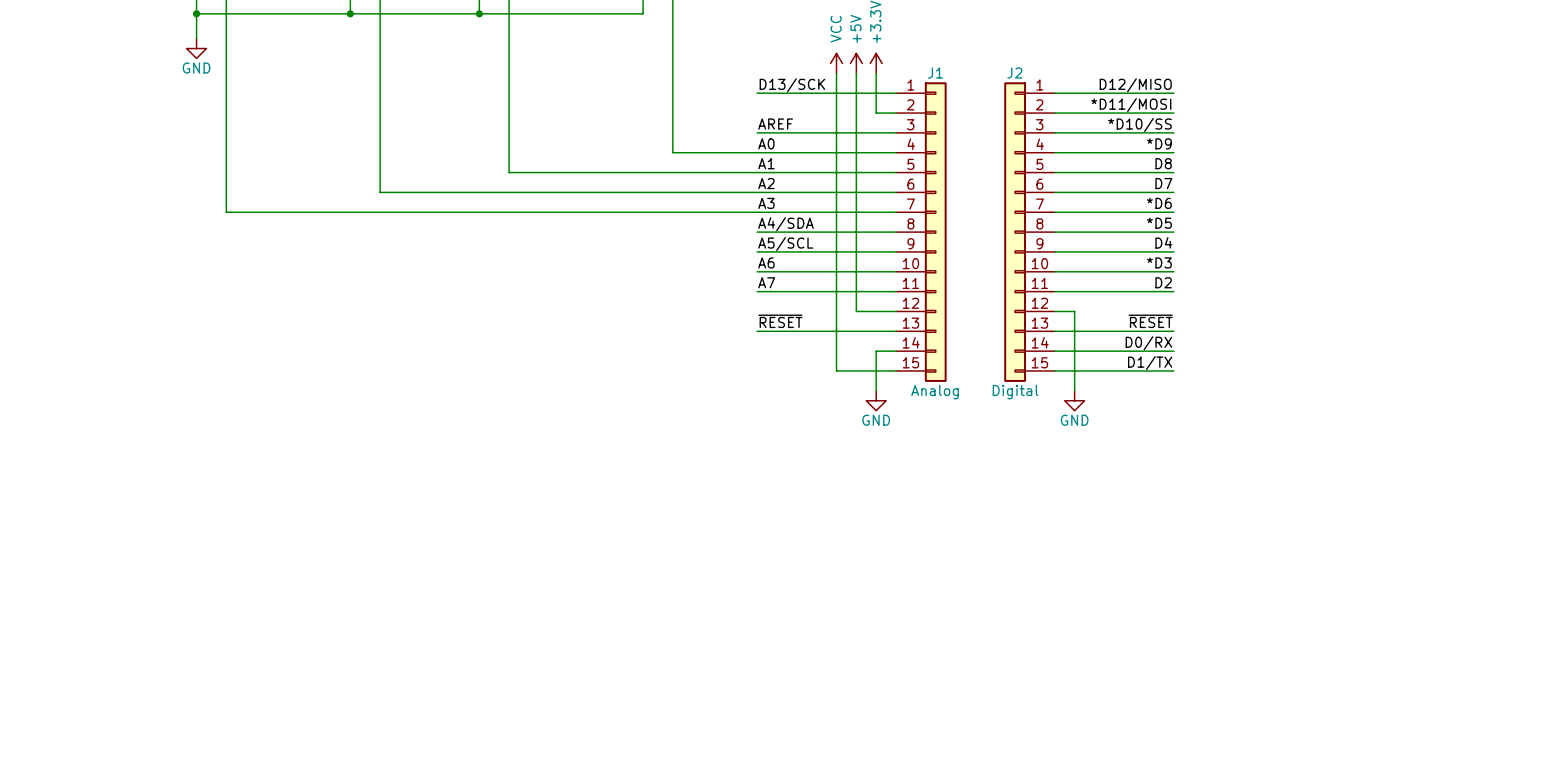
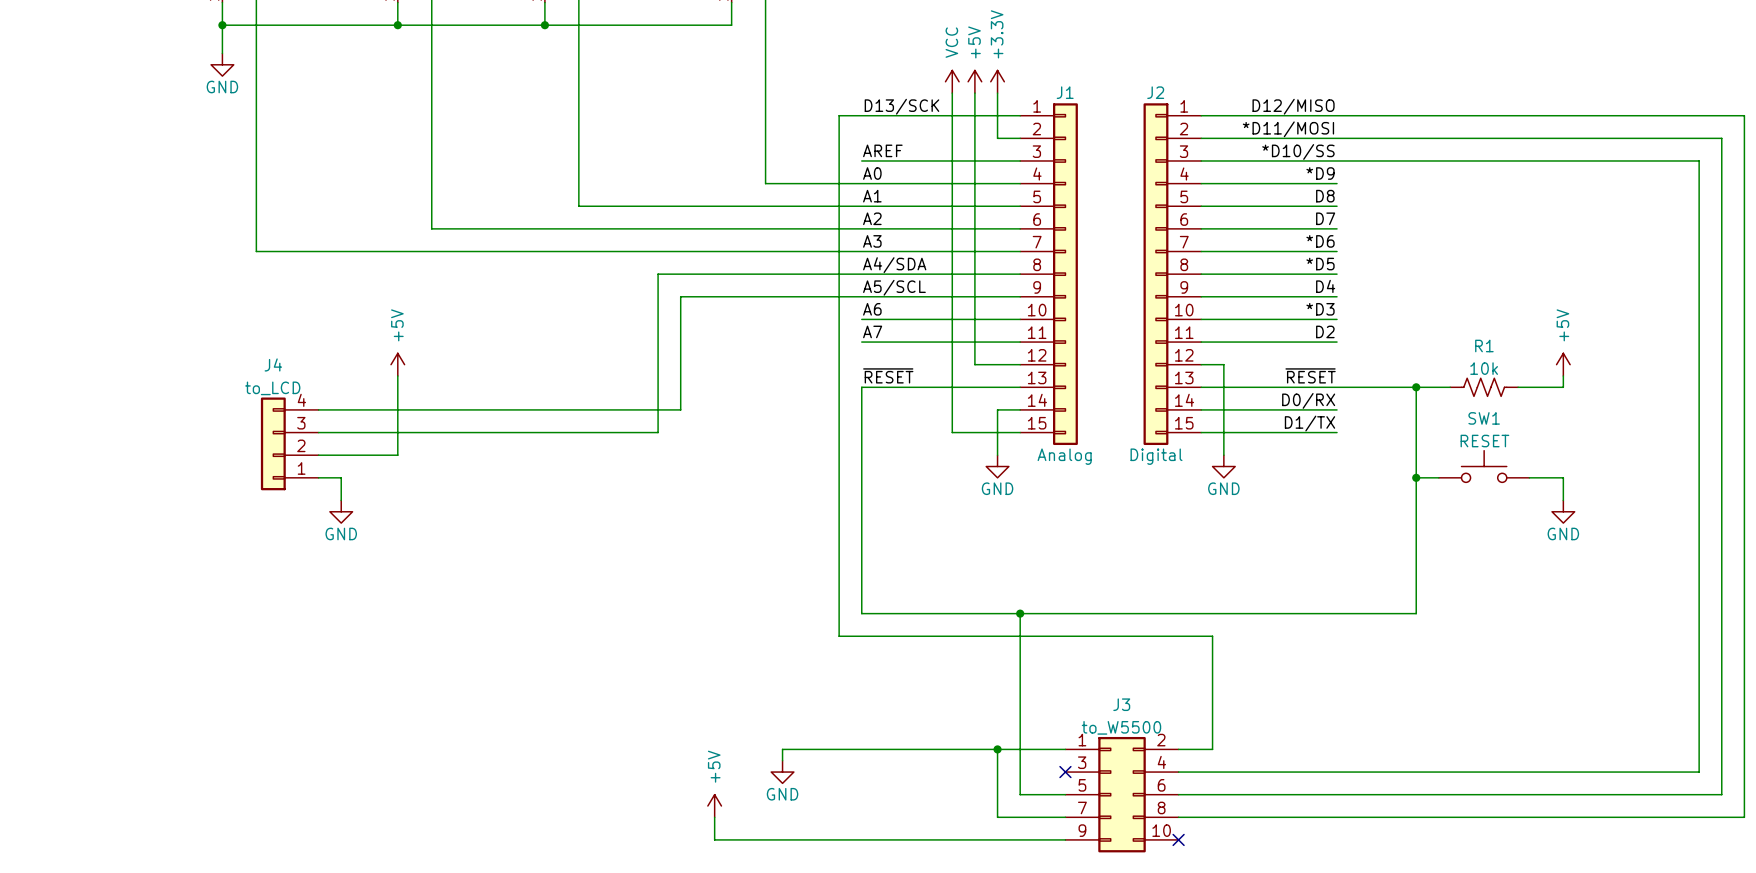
wire: none -> (861, 115) (839, 115) (839, 636) (1212, 636) (1212, 749) (1178, 749)
wire: none -> (1337, 115) (1744, 115) (1744, 817) (1178, 817)
wire: none -> (1337, 138) (1721, 138) (1721, 794) (1178, 794)
wire: none -> (1337, 160) (1699, 160) (1699, 772) (1178, 772)
wire: none -> (861, 274) (658, 274) (658, 432) (318, 432)
wire: none -> (861, 296) (680, 296) (680, 409) (318, 409)
power symbol: none -> +5V (397, 364)
power symbol: none -> +5V (1563, 364)
wire: none -> (397, 375) (397, 455) (318, 455)
wire: none -> (1563, 375) (1563, 387) (1518, 387)
wire: none -> (861, 387) (861, 613) (1416, 613) (1416, 387)
wire: none -> (1337, 387) (1450, 387)
junction: none -> (1416, 387)
R1: none -> 10k (1484, 387)
J4: none -> to_LCD (289, 443)
SW1: none -> RESET (1484, 466)
wire: none -> (318, 477) (341, 477) (341, 500)
wire: none -> (1416, 477) (1438, 477)
junction: none -> (1416, 477)
wire: none -> (1529, 477) (1563, 477) (1563, 500)
power symbol: none -> GND (341, 511)
power symbol: none -> GND (1563, 511)
wire: none -> (1020, 613) (1020, 794) (1065, 794)
junction: none -> (1020, 613)
wire: none -> (997, 749) (997, 817) (1065, 817)
junction: none -> (997, 749)
wire: none -> (1065, 749) (782, 749) (782, 760)
power symbol: none -> GND (782, 772)
no-connect mark: none -> (1065, 772)
J3: none -> to_W5500 (1122, 794)
power symbol: none -> +5V (714, 805)
wire: none -> (714, 817) (714, 839) (1065, 839)
no-connect mark: none -> (1178, 839)

